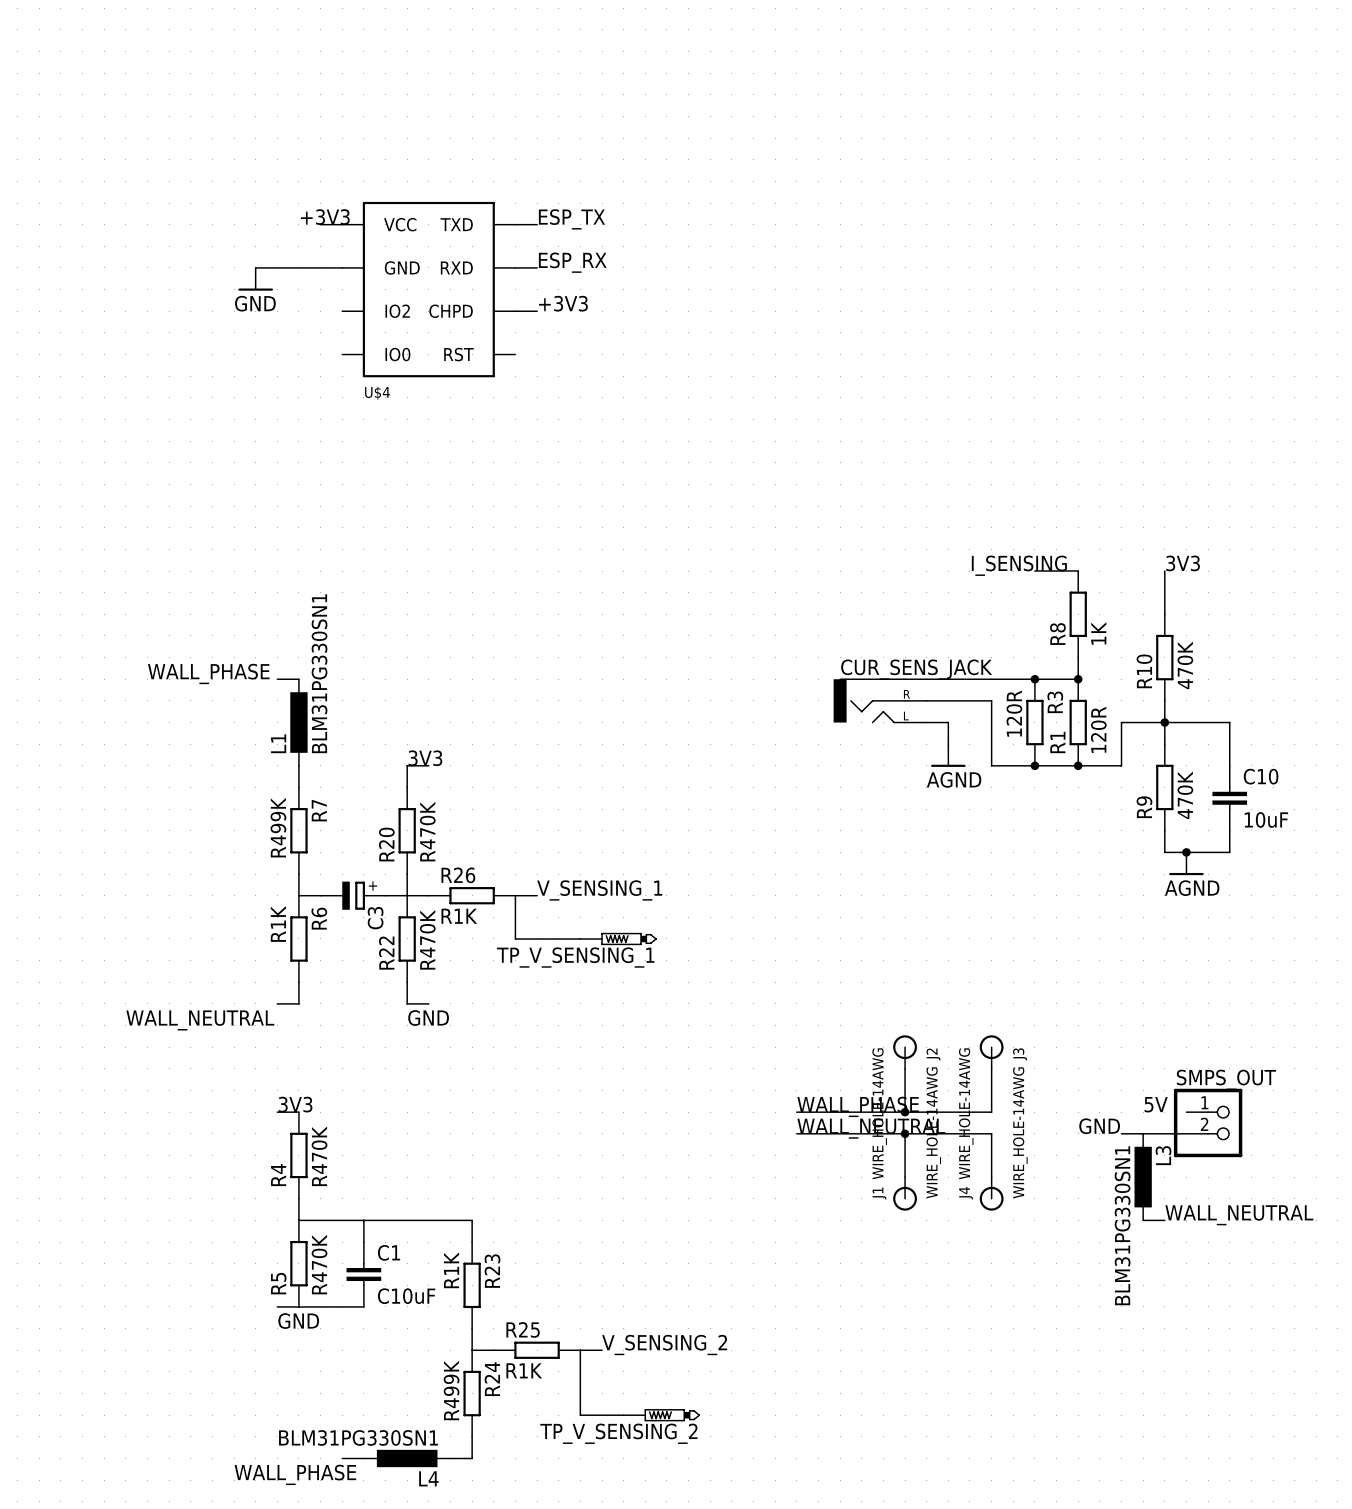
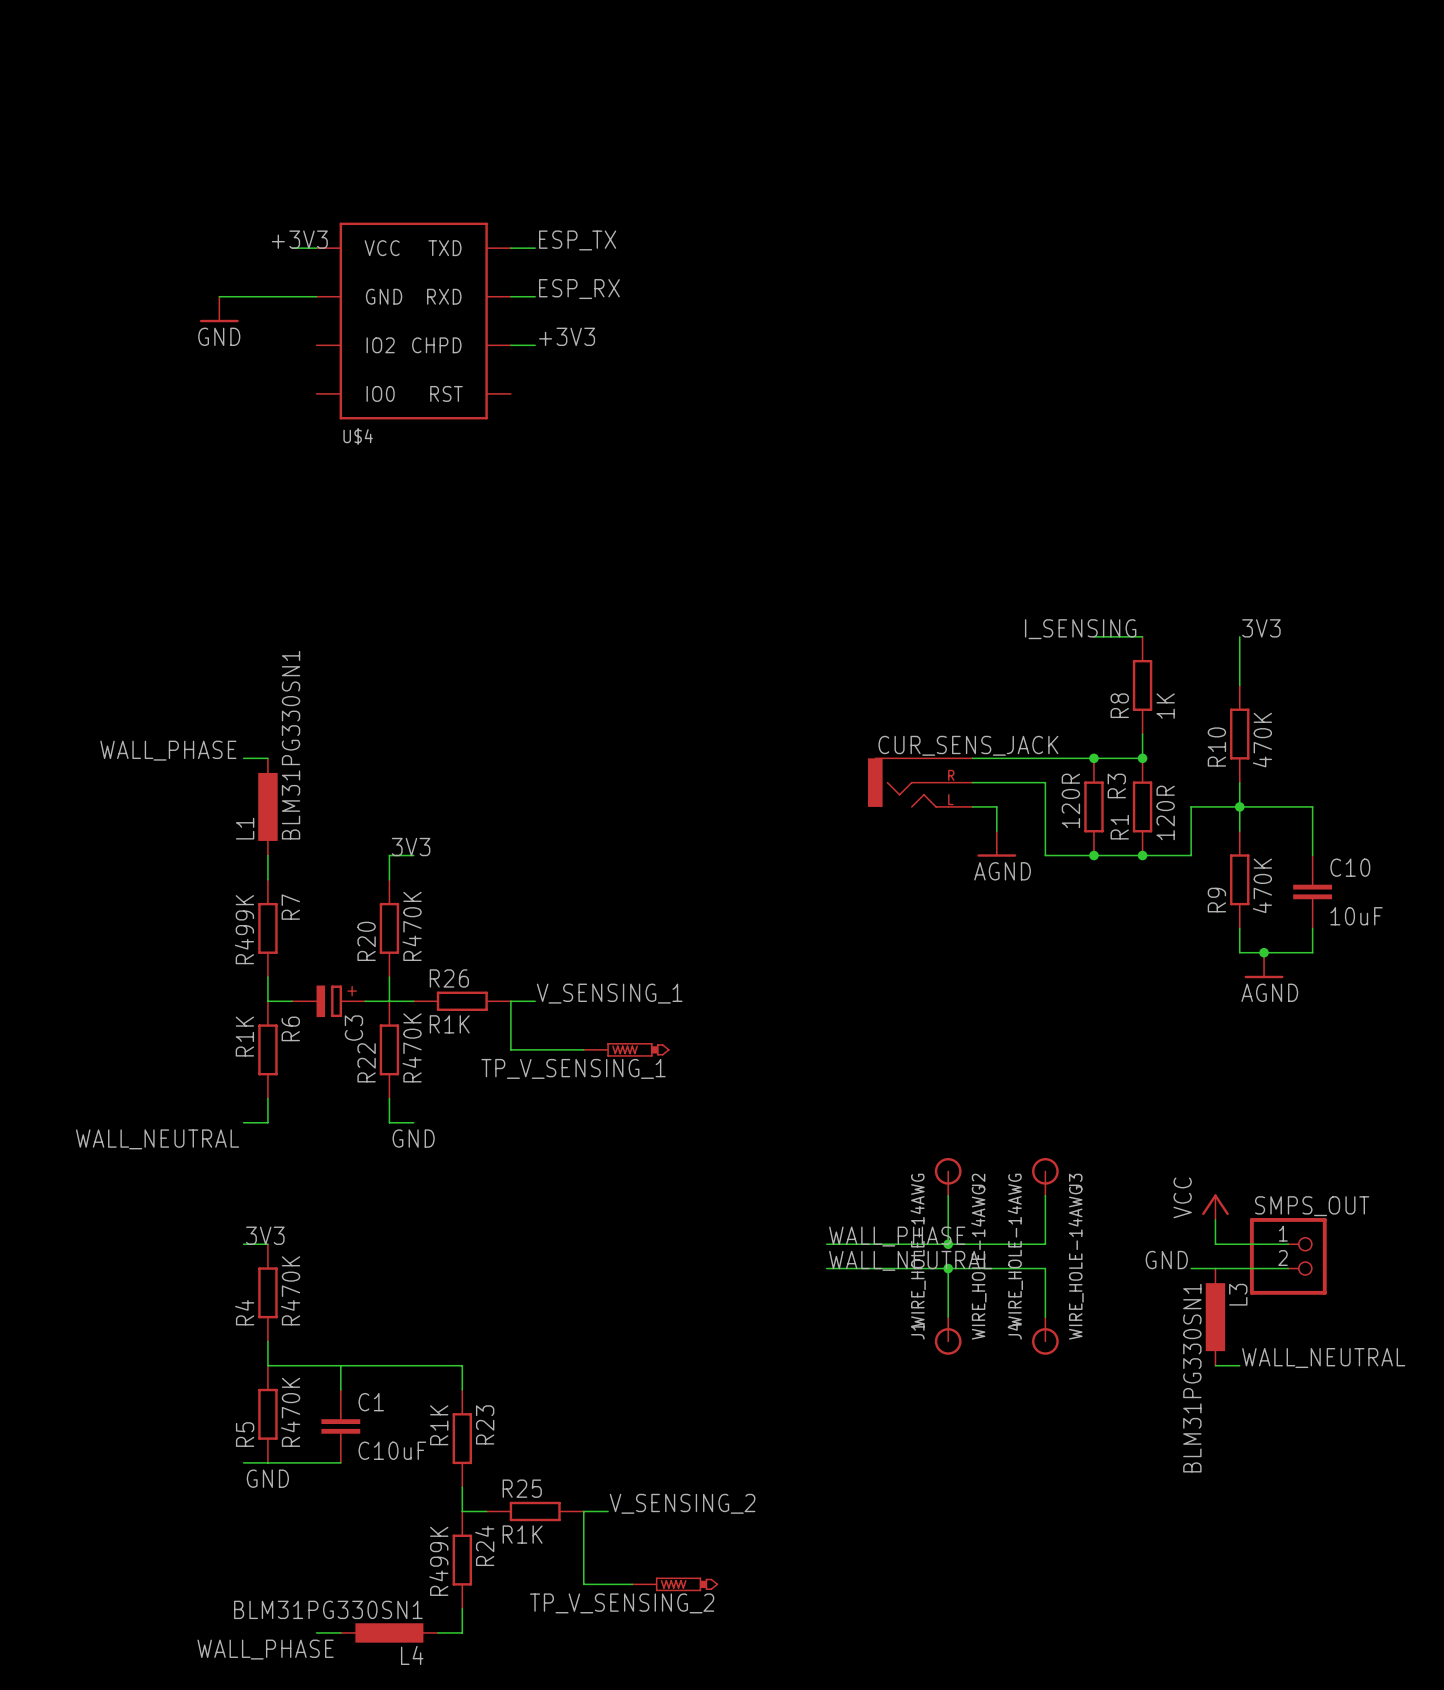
power symbol: none -> VCC (1215, 1207)
wire: none -> (1215, 1219) (1215, 1244) (1264, 1244)
label: 5V (1156, 1104) -> none

